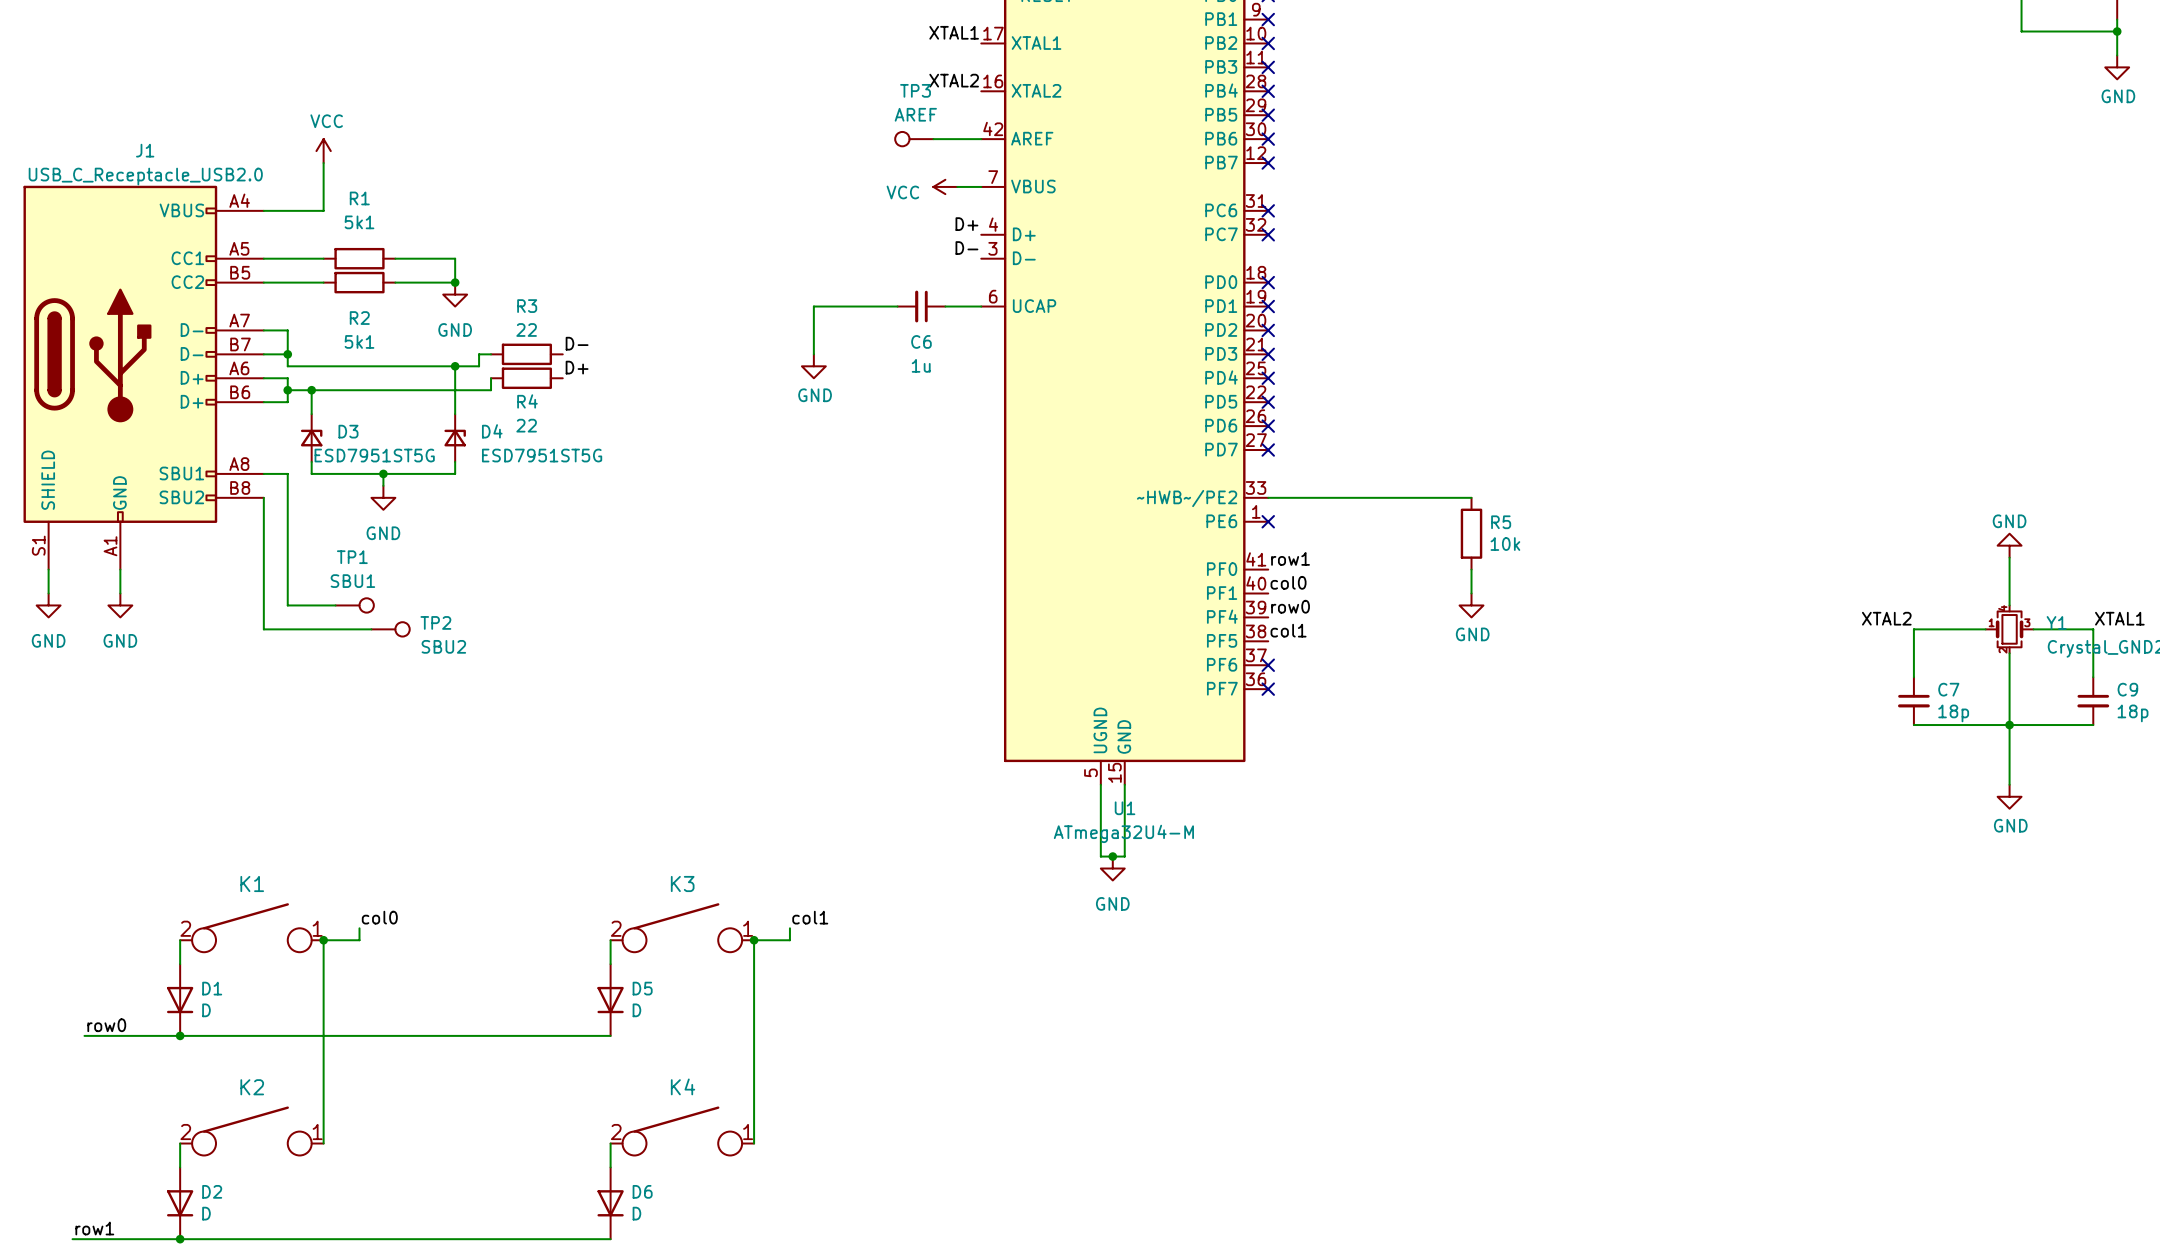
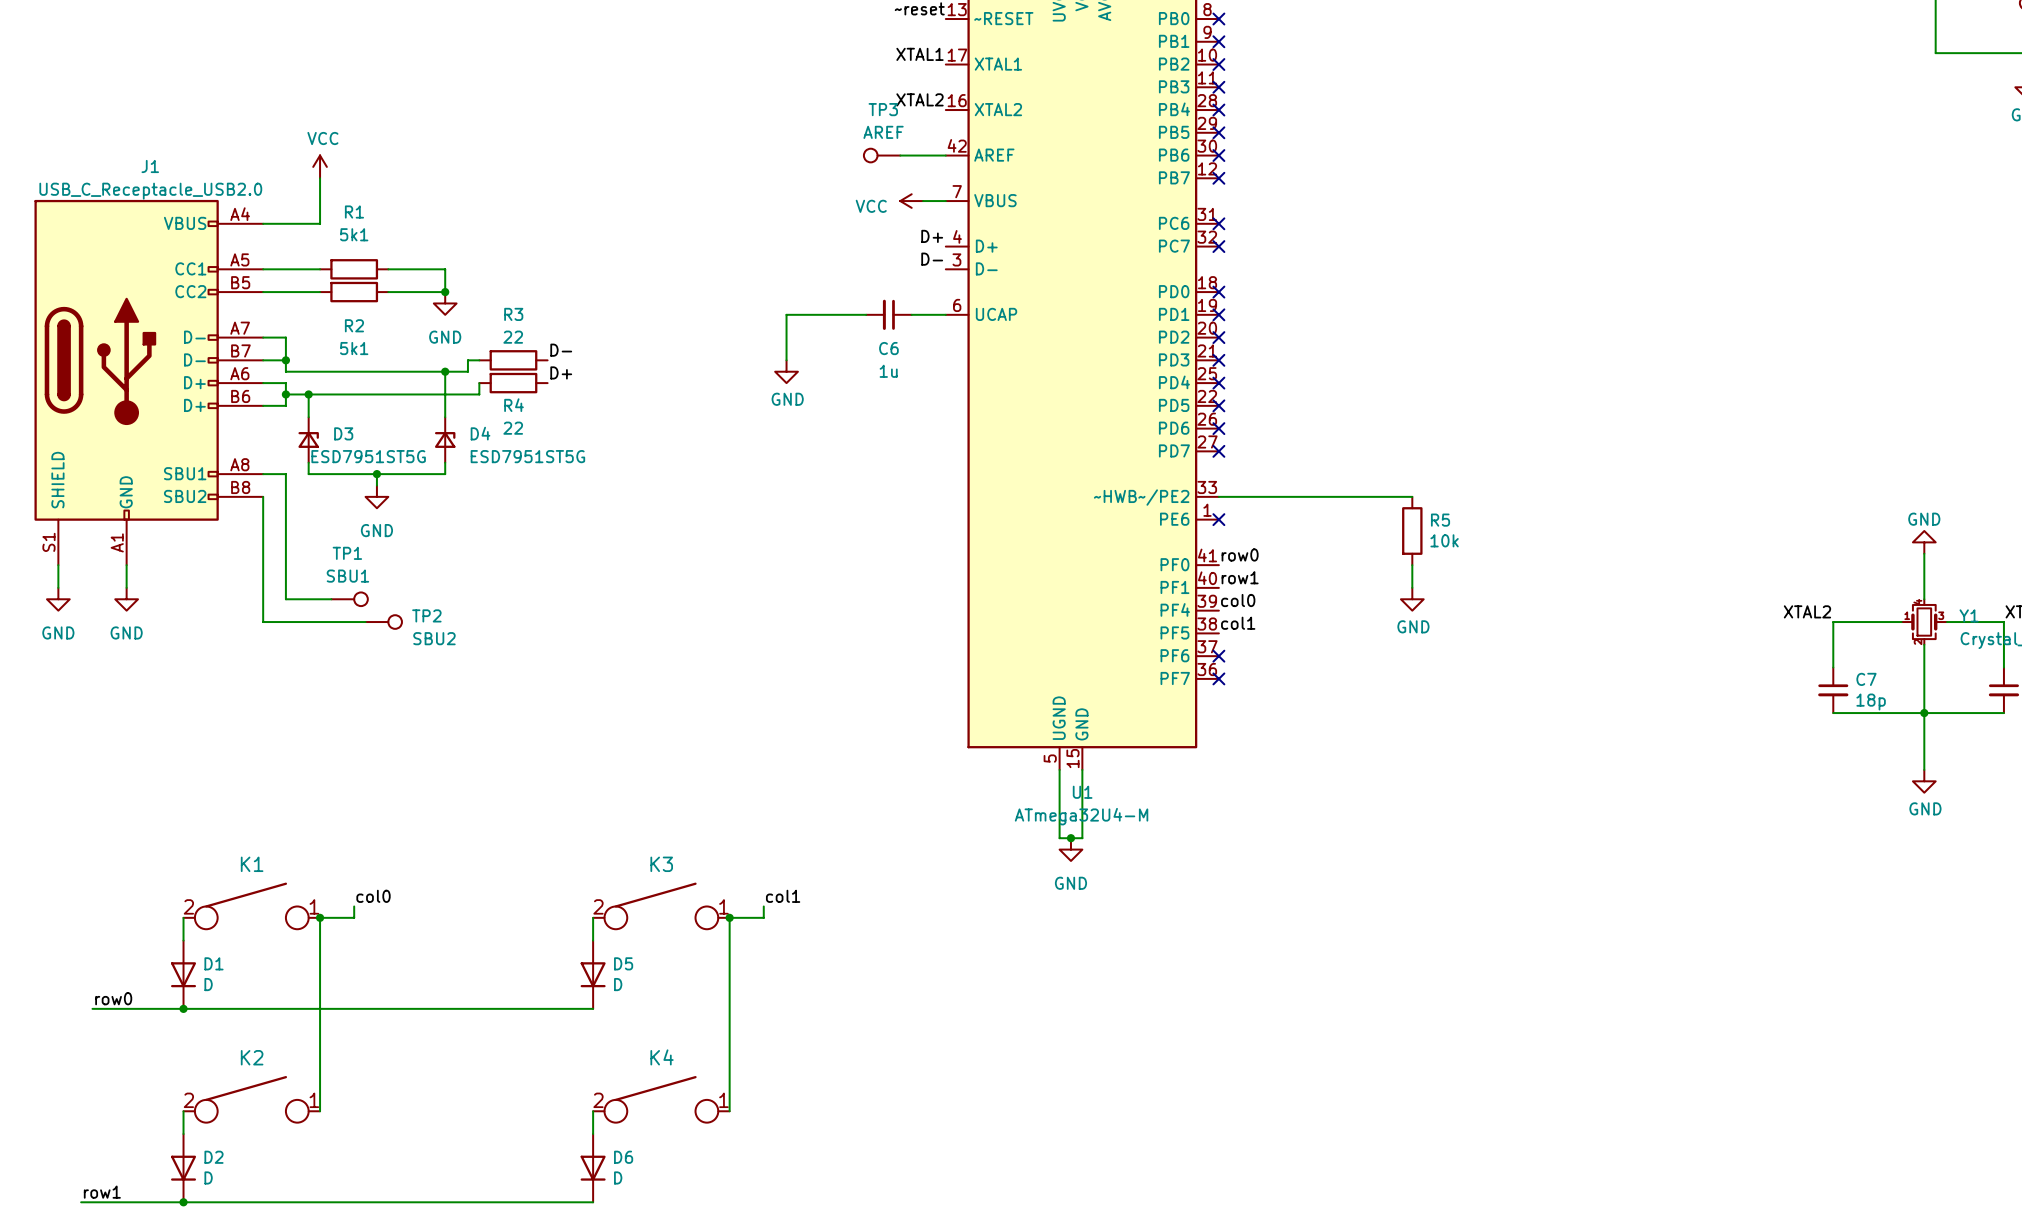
label: row1 (1290, 558) -> row0 (1240, 554)
label: col0 (1288, 582) -> row1 (1240, 577)
label: row0 (1290, 606) -> col0 (1238, 600)

